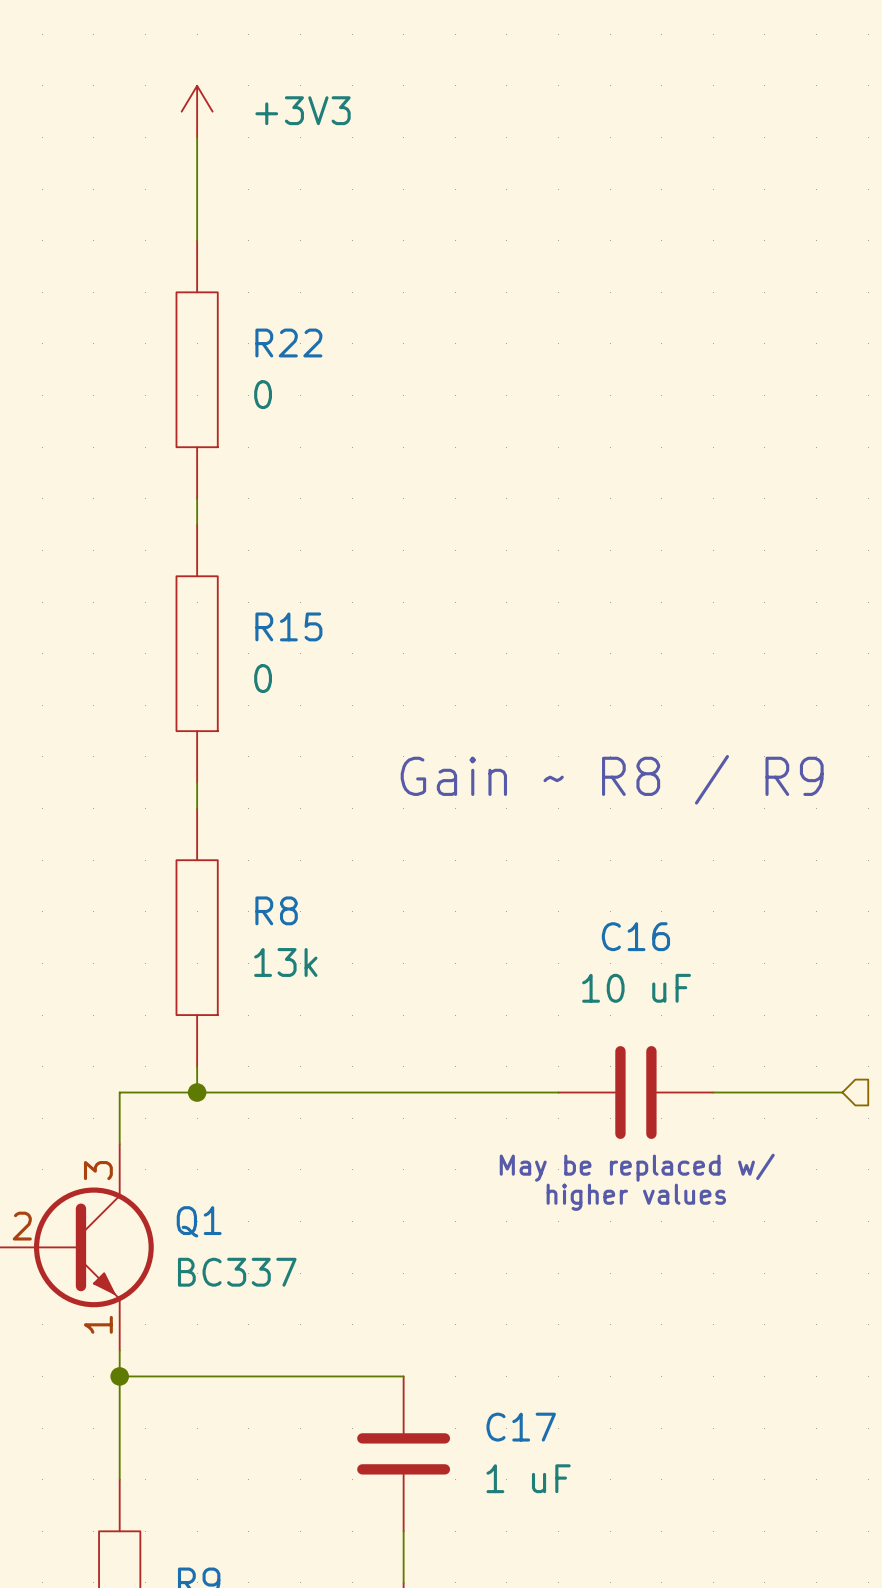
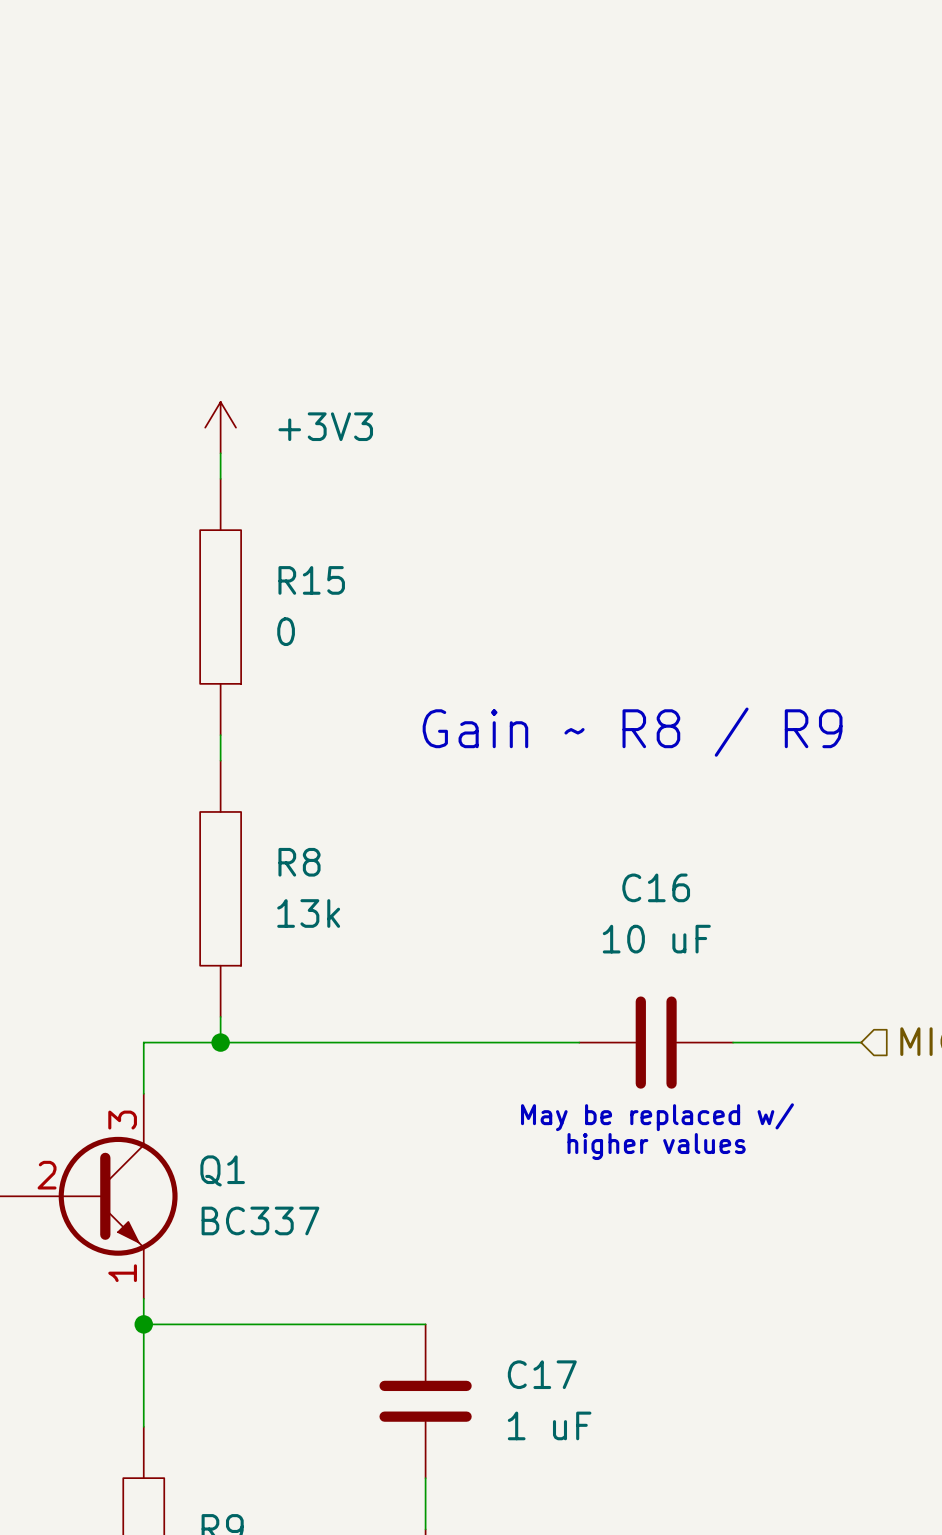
power symbol position: +3V3 (197, 111) -> +3V3 (220, 427)
wire: (197, 137) (197, 240) -> none
R22: 0 (197, 369) -> none

